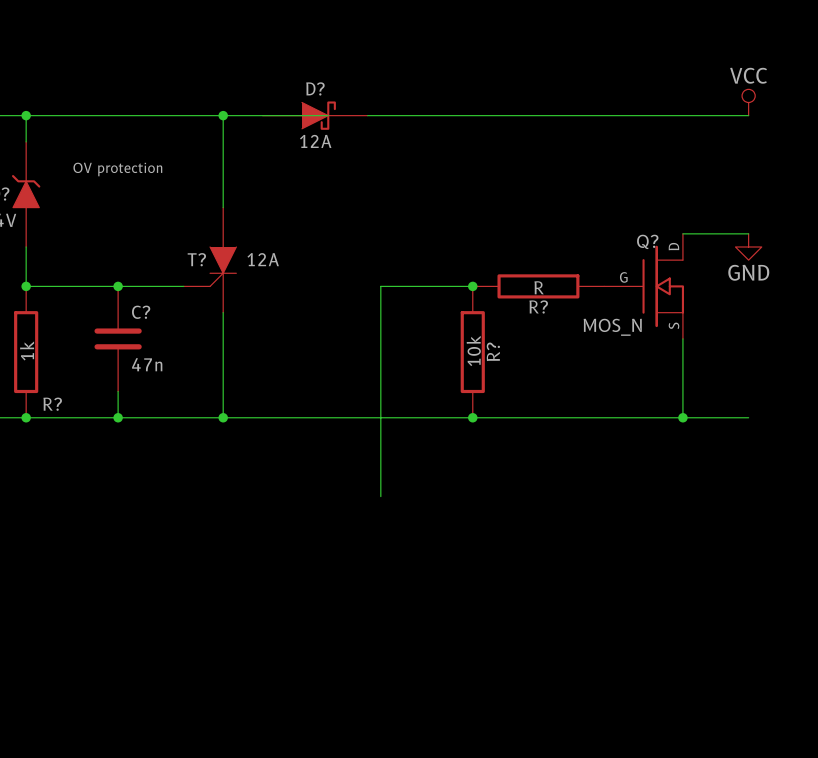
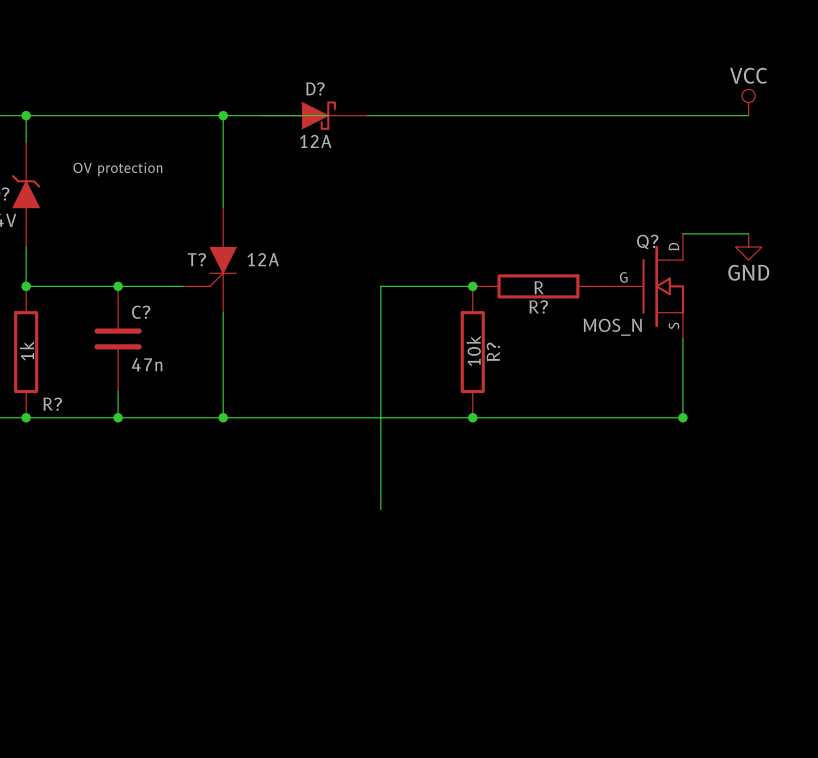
wire: (682, 417) (748, 417) -> none
wire: none -> (380, 496) (380, 509)

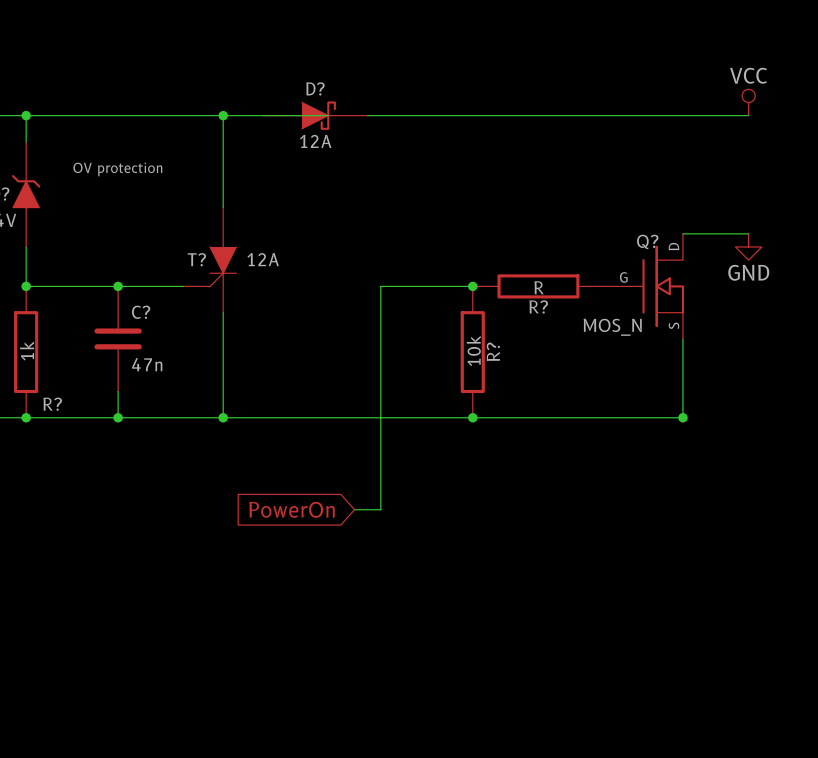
global label: none -> PowerOn (291, 509)
wire: none -> (354, 509) (380, 509)

